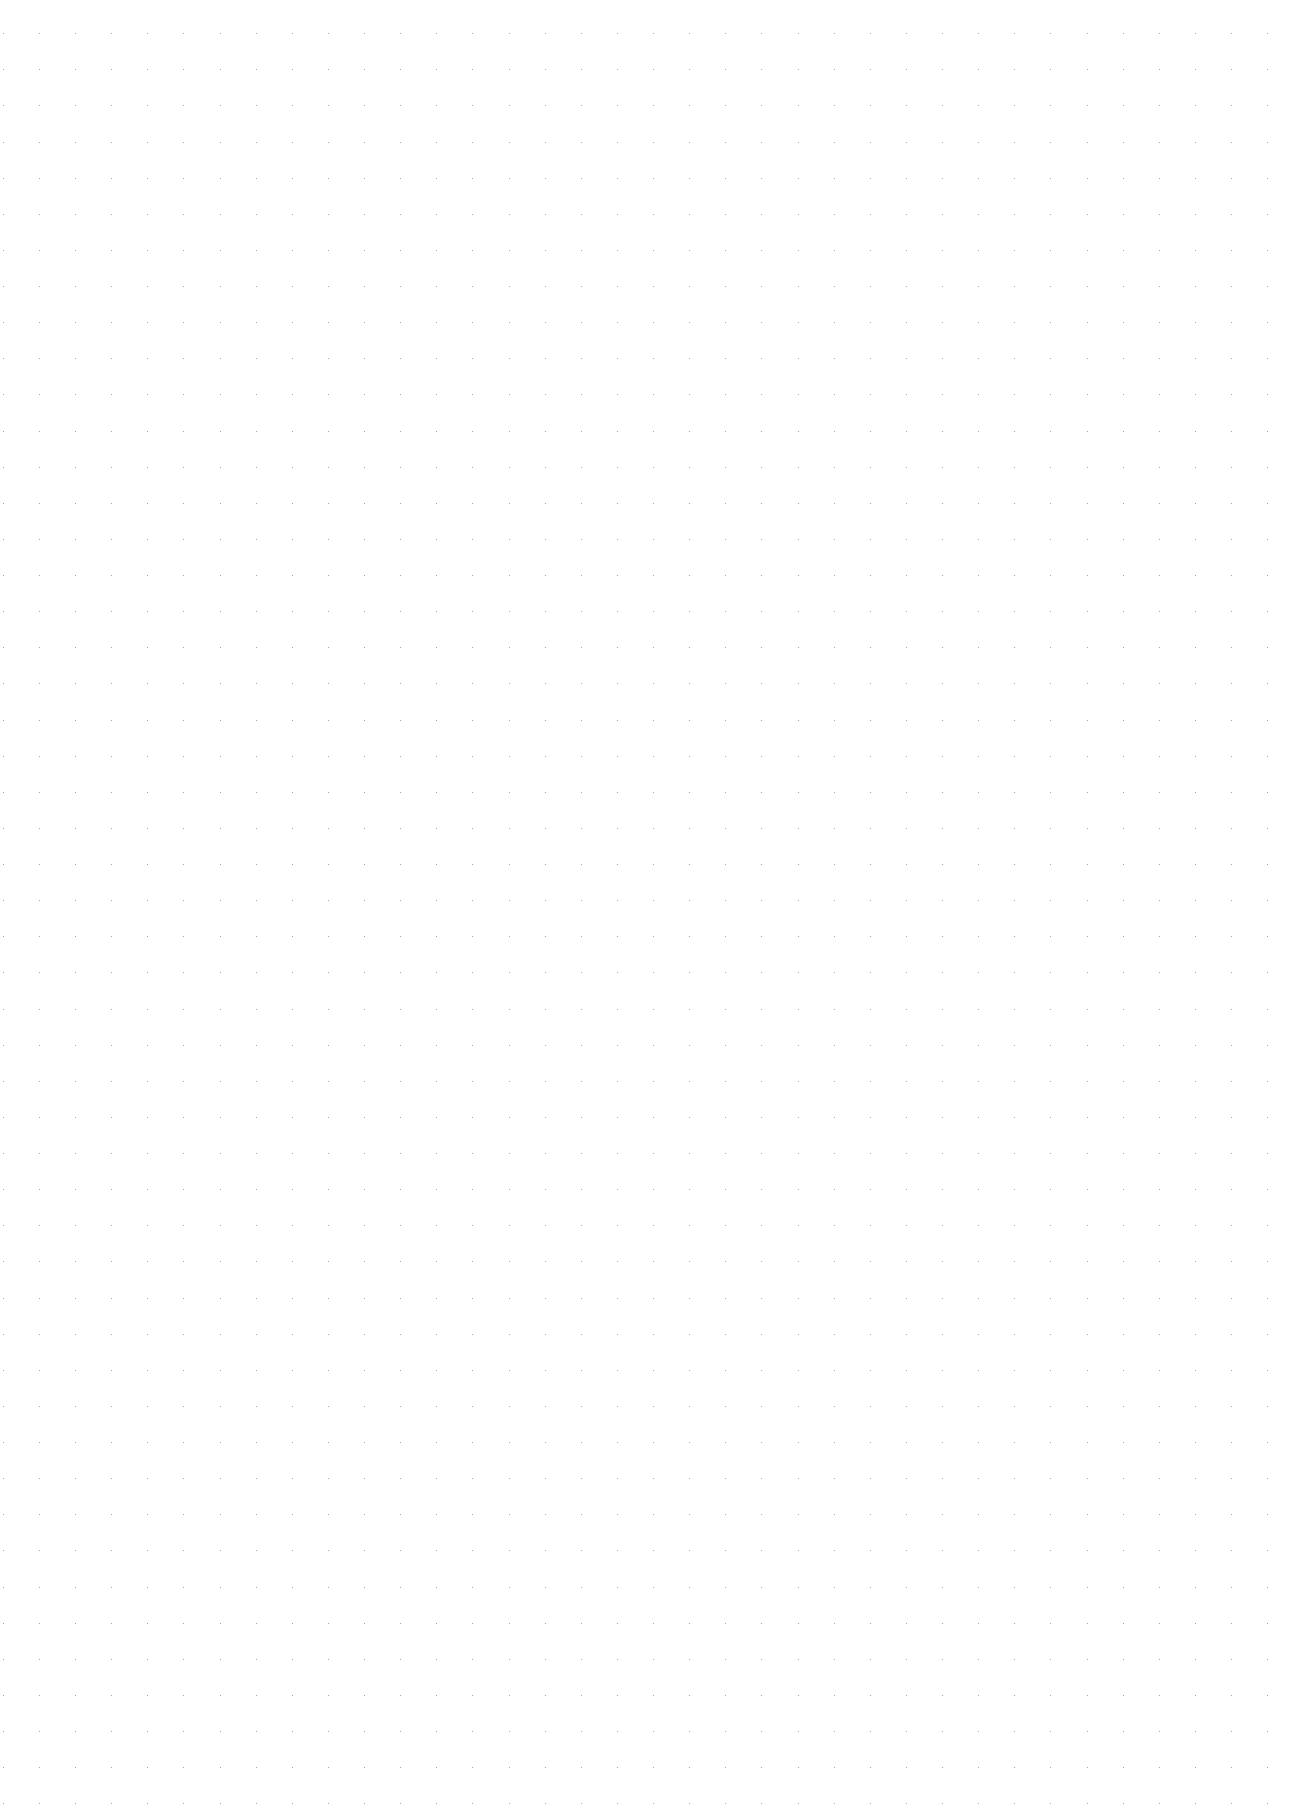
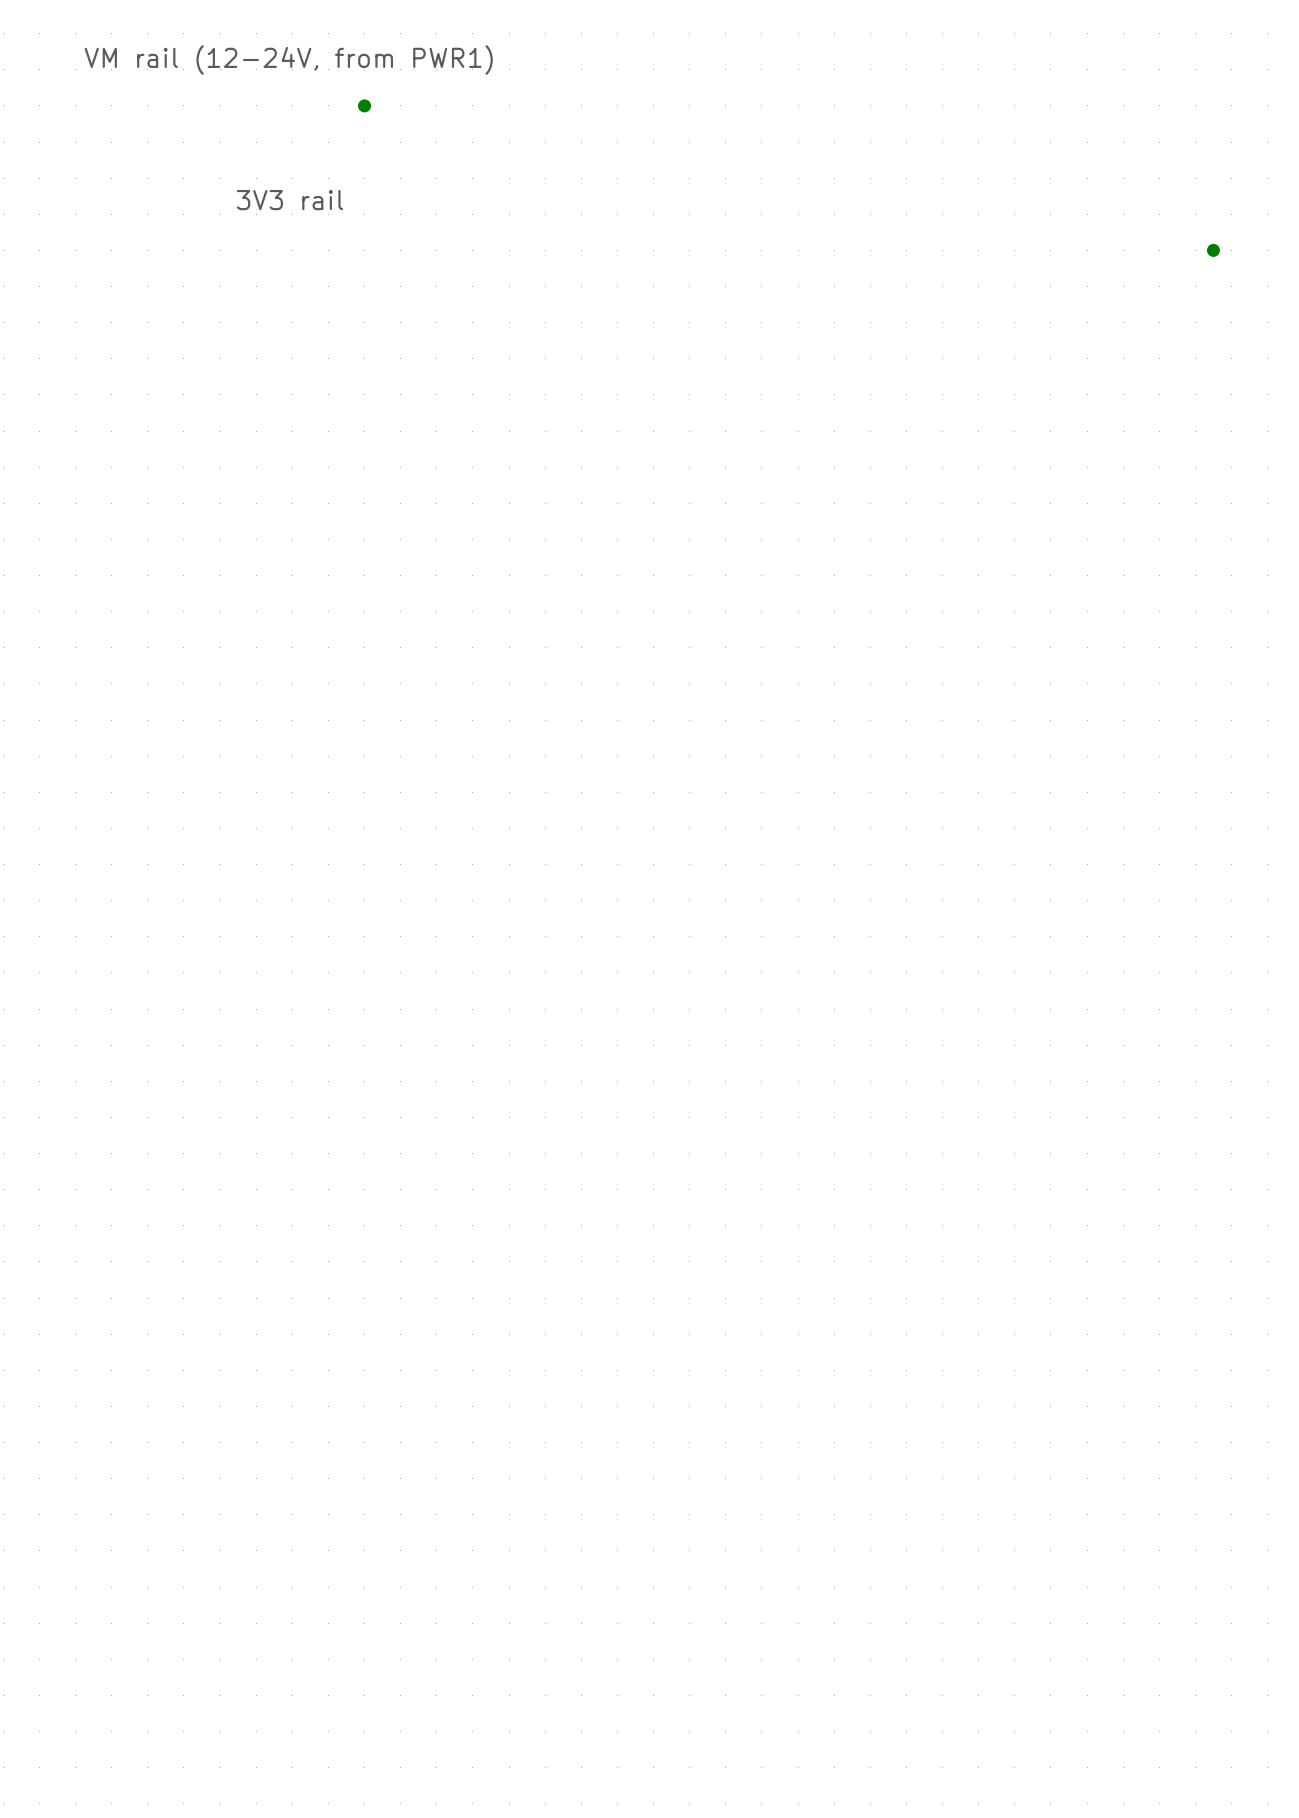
text: none -> VM rail (12-24V, from PWR1) (288, 60)
junction: none -> (364, 105)
text: none -> 3V3 rail (290, 200)
junction: none -> (1213, 250)

